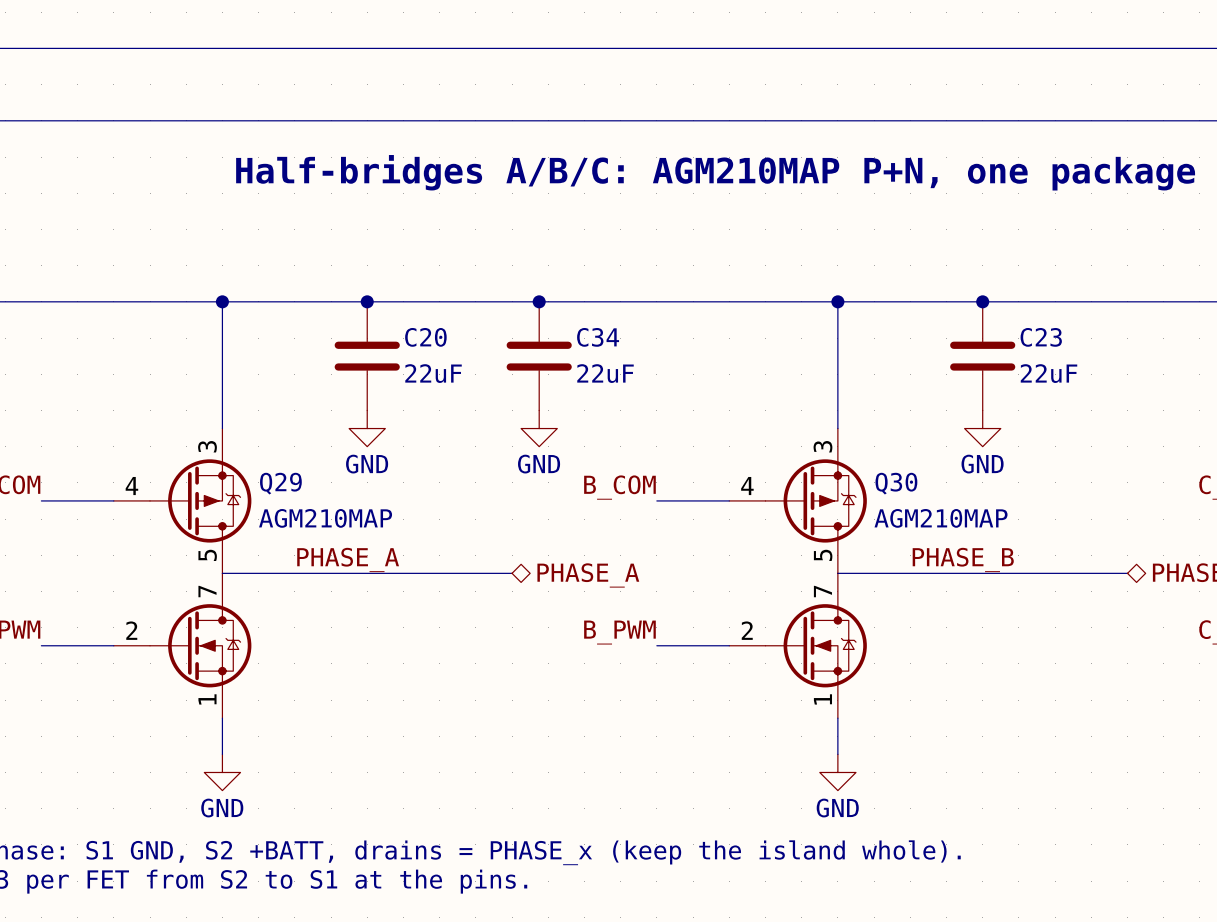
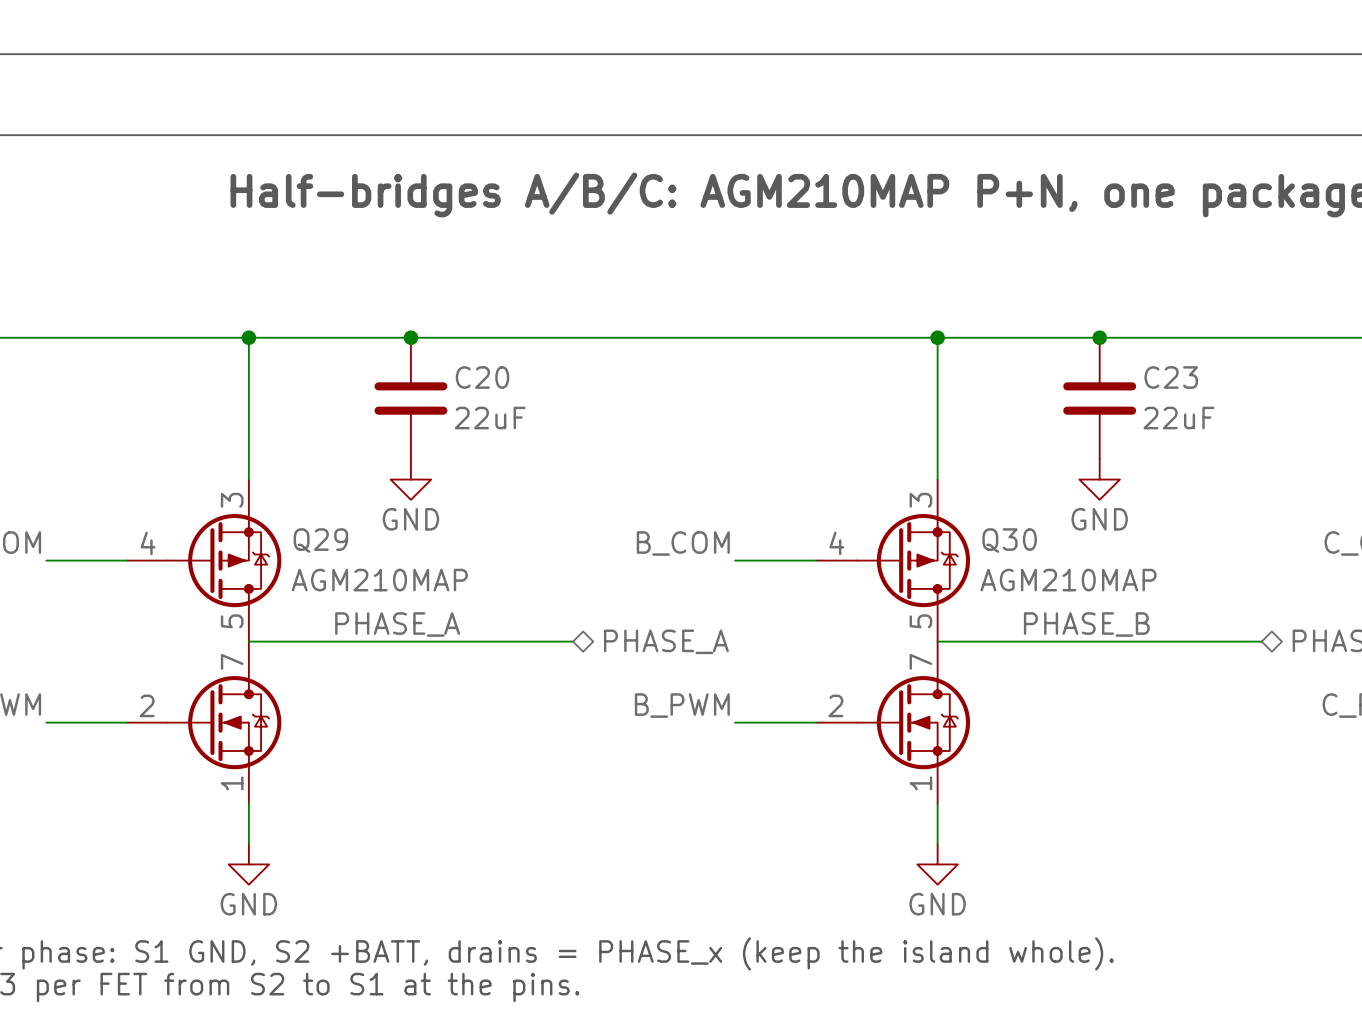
junction: (539, 301) -> none
C34: 22uF (539, 356) -> none
power symbol: GND (539, 428) -> none

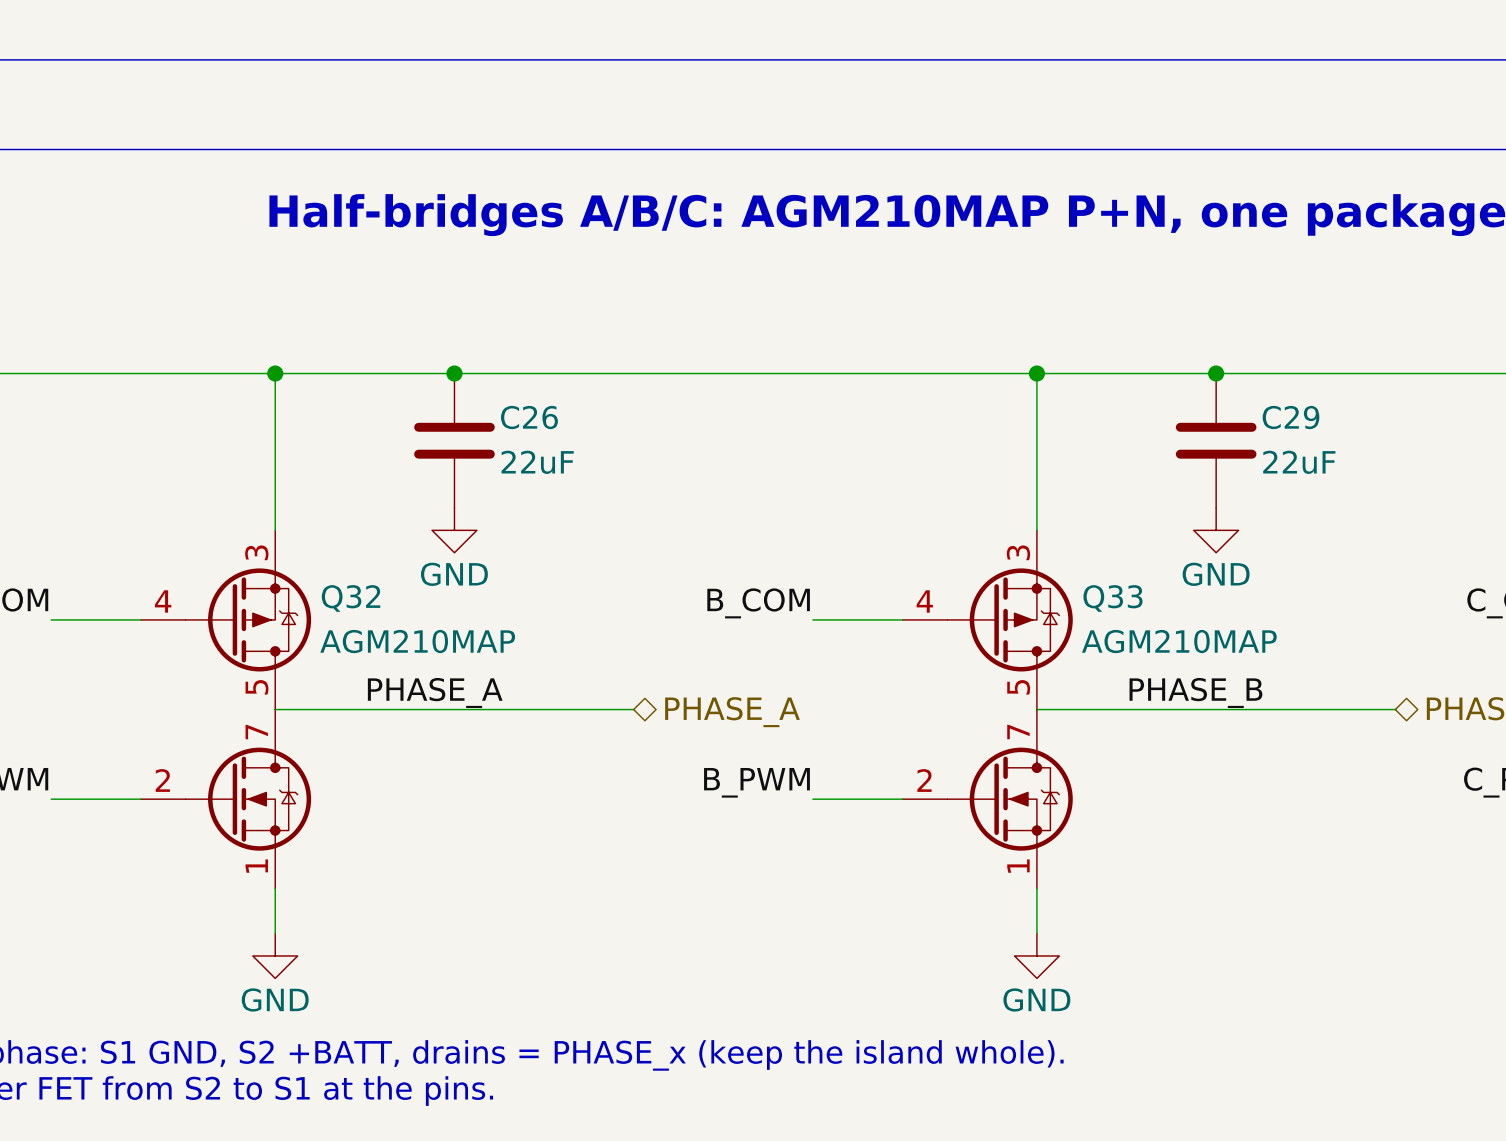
C20 name: C20 (482, 377) -> C26 (529, 417)
C23 name: C23 (1171, 377) -> C29 (1291, 417)
Q29 name: Q29 (320, 540) -> Q32 (351, 598)
Q30 name: Q30 (1009, 540) -> Q33 (1113, 598)

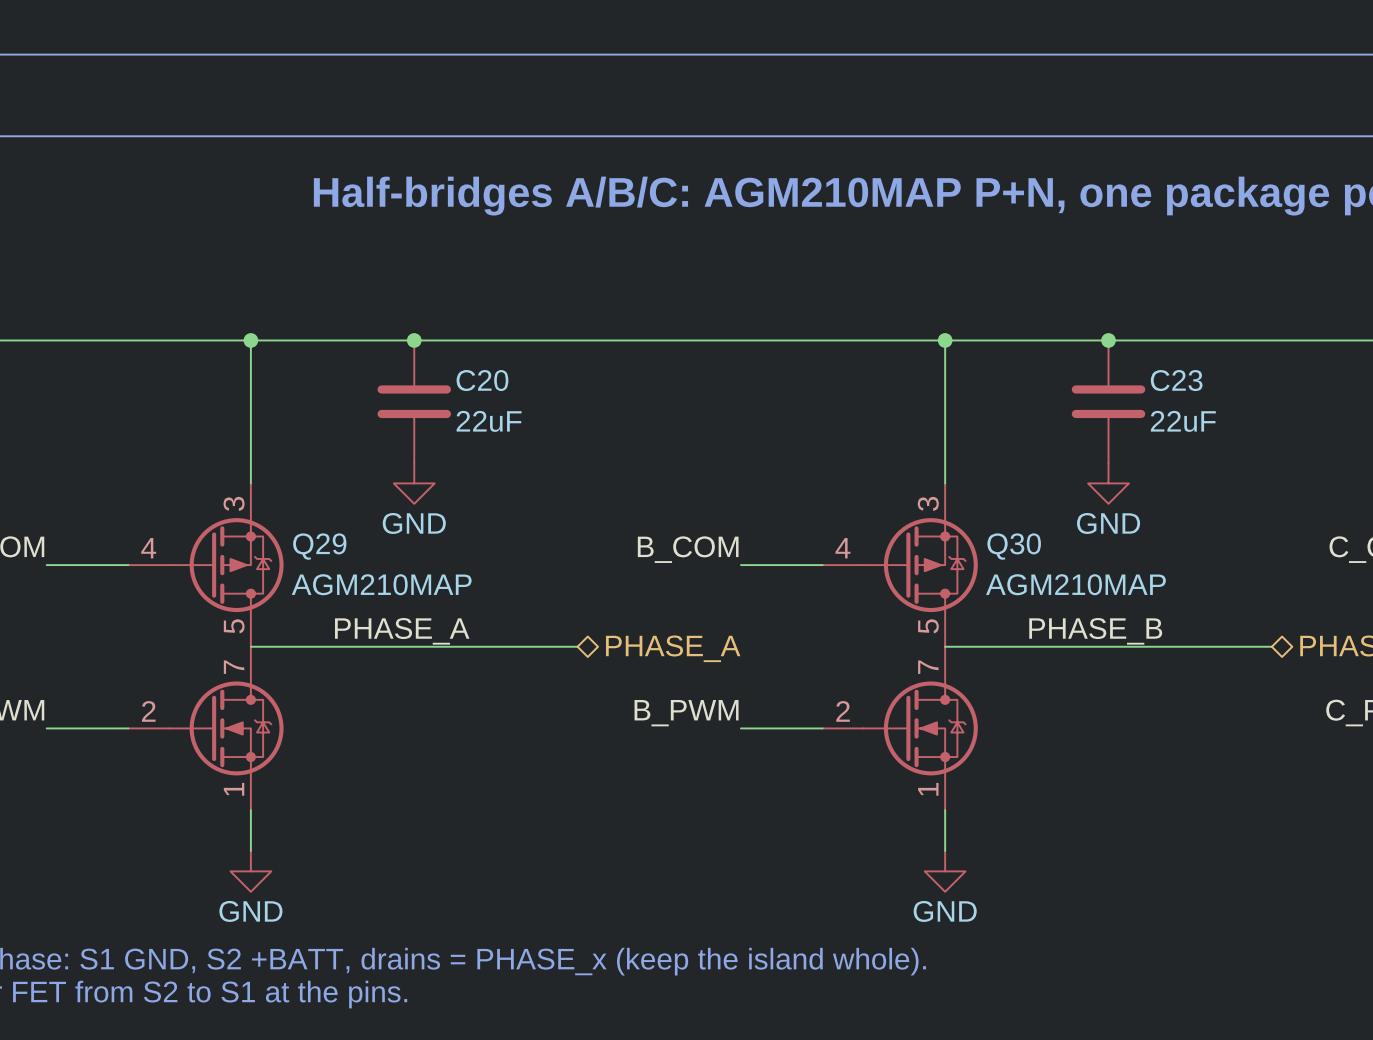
C26 name: C26 (529, 417) -> C20 (482, 380)
C29 name: C29 (1291, 417) -> C23 (1176, 380)
Q32 name: Q32 (351, 598) -> Q29 (319, 546)
Q33 name: Q33 (1113, 598) -> Q30 (1014, 546)

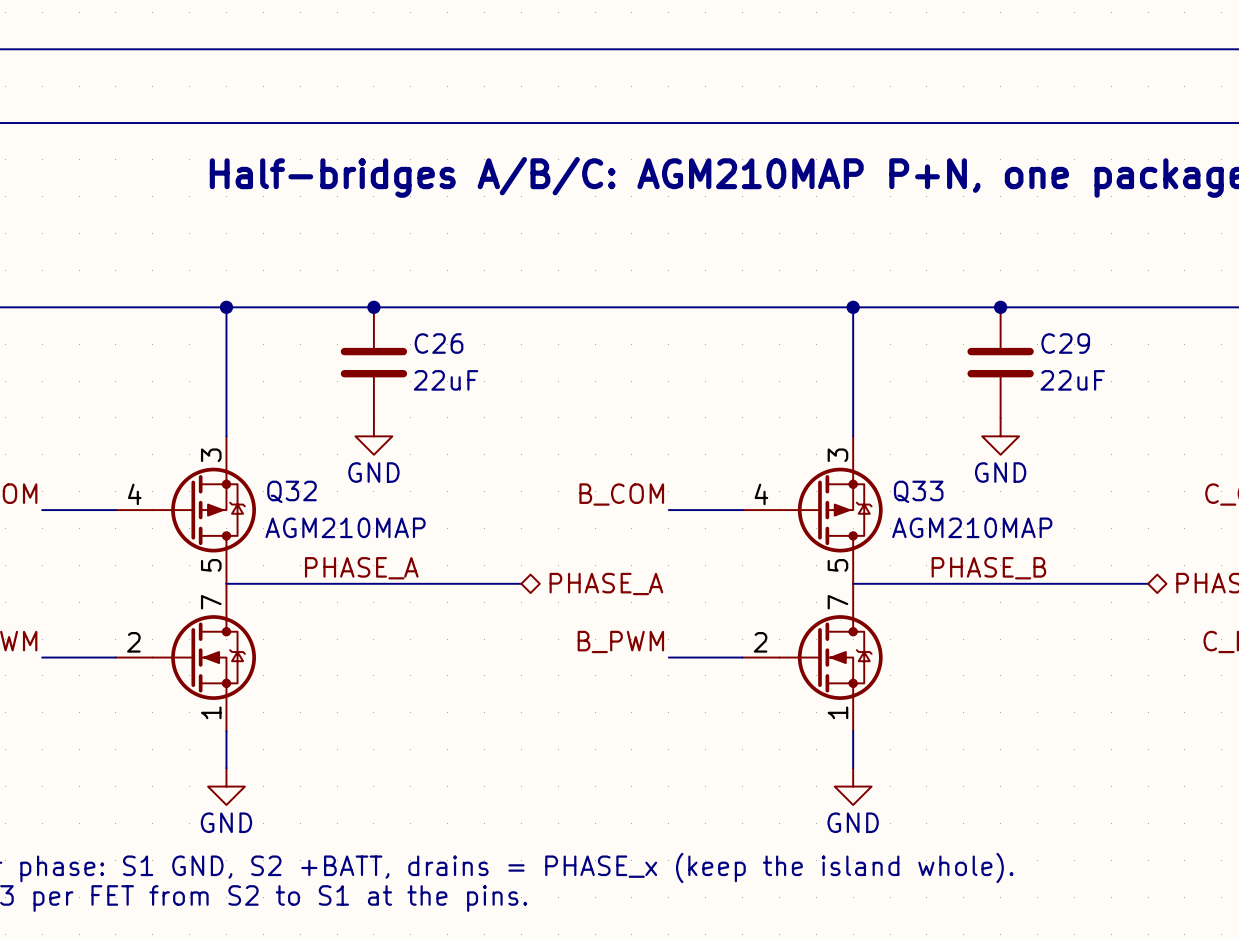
C20 name: C20 (482, 380) -> C26 (439, 343)
C23 name: C23 (1176, 380) -> C29 (1065, 343)
Q29 name: Q29 (319, 546) -> Q32 (292, 491)
Q30 name: Q30 (1014, 546) -> Q33 (918, 491)

